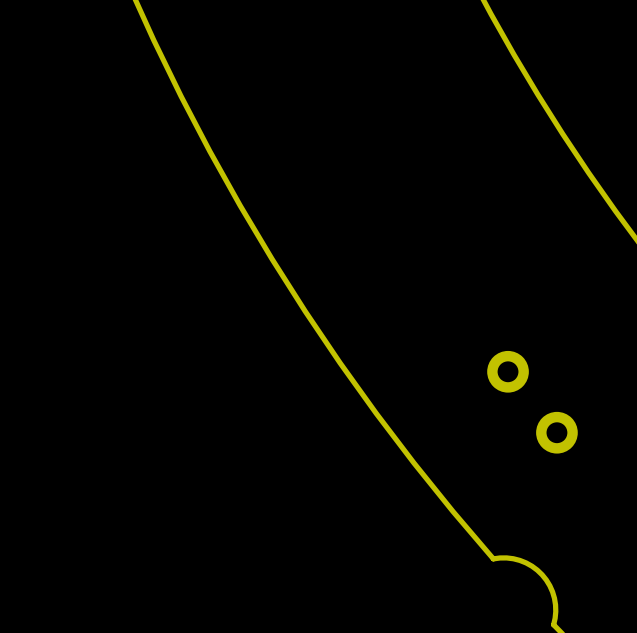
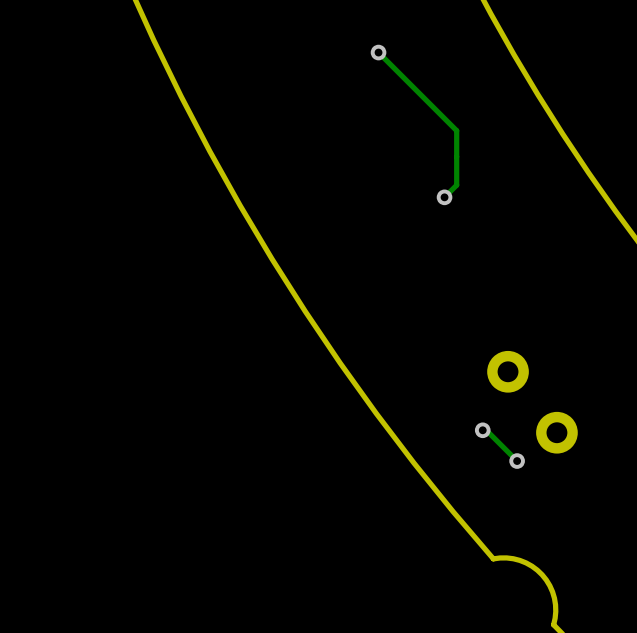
track: none -> (378, 52) (456, 130) (456, 185) (444, 197)
via: none -> (378, 52)
via: none -> (444, 197)
track: none -> (482, 430) (486, 430) (517, 461)
via: none -> (482, 430)
via: none -> (517, 461)

